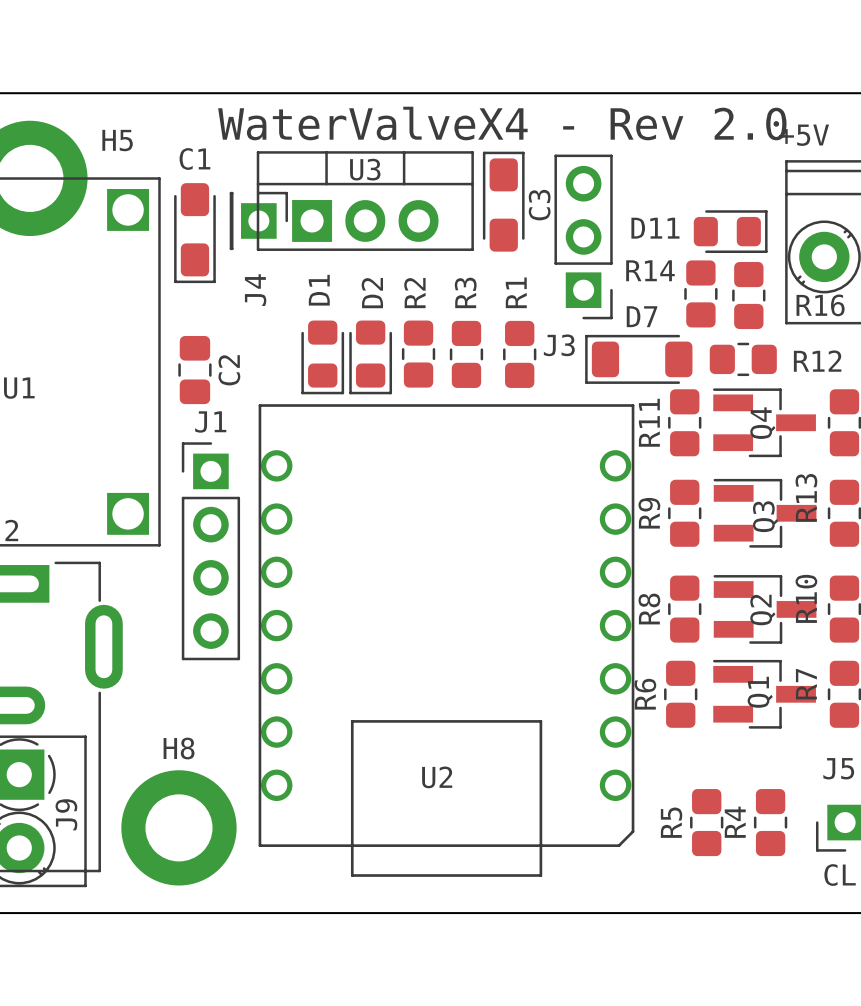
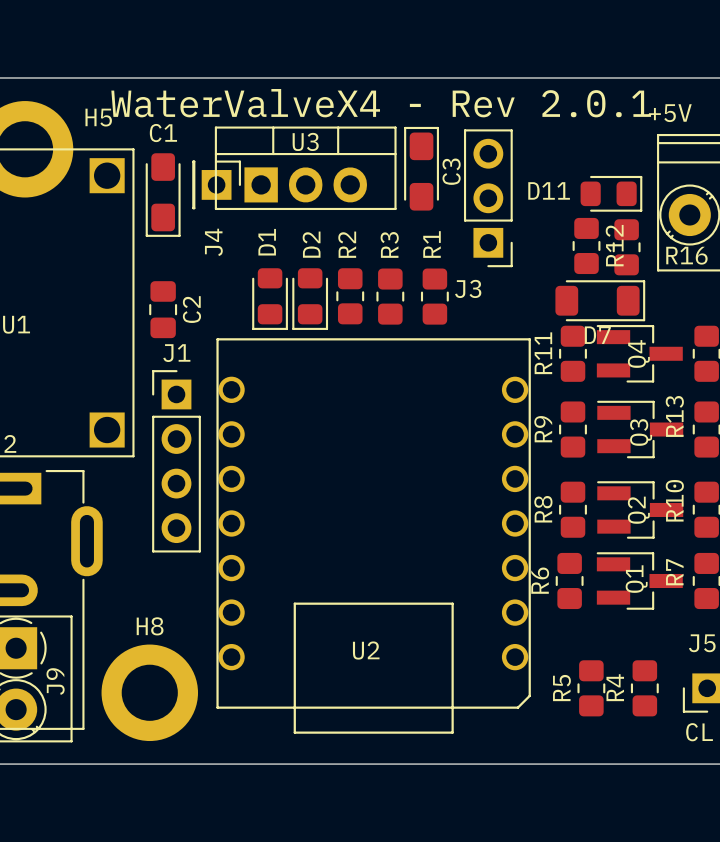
text: WaterValveX4 - Rev 2.0 (502, 123) -> WaterValveX4 - Rev 2.0.1 (381, 103)
R14 name: R14 (650, 270) -> R12 (614, 245)
D7 rotation: 0° (638, 359) -> 180° (600, 300)
D7 position: (638, 359) -> (600, 300)
R12: (743, 359) -> none

